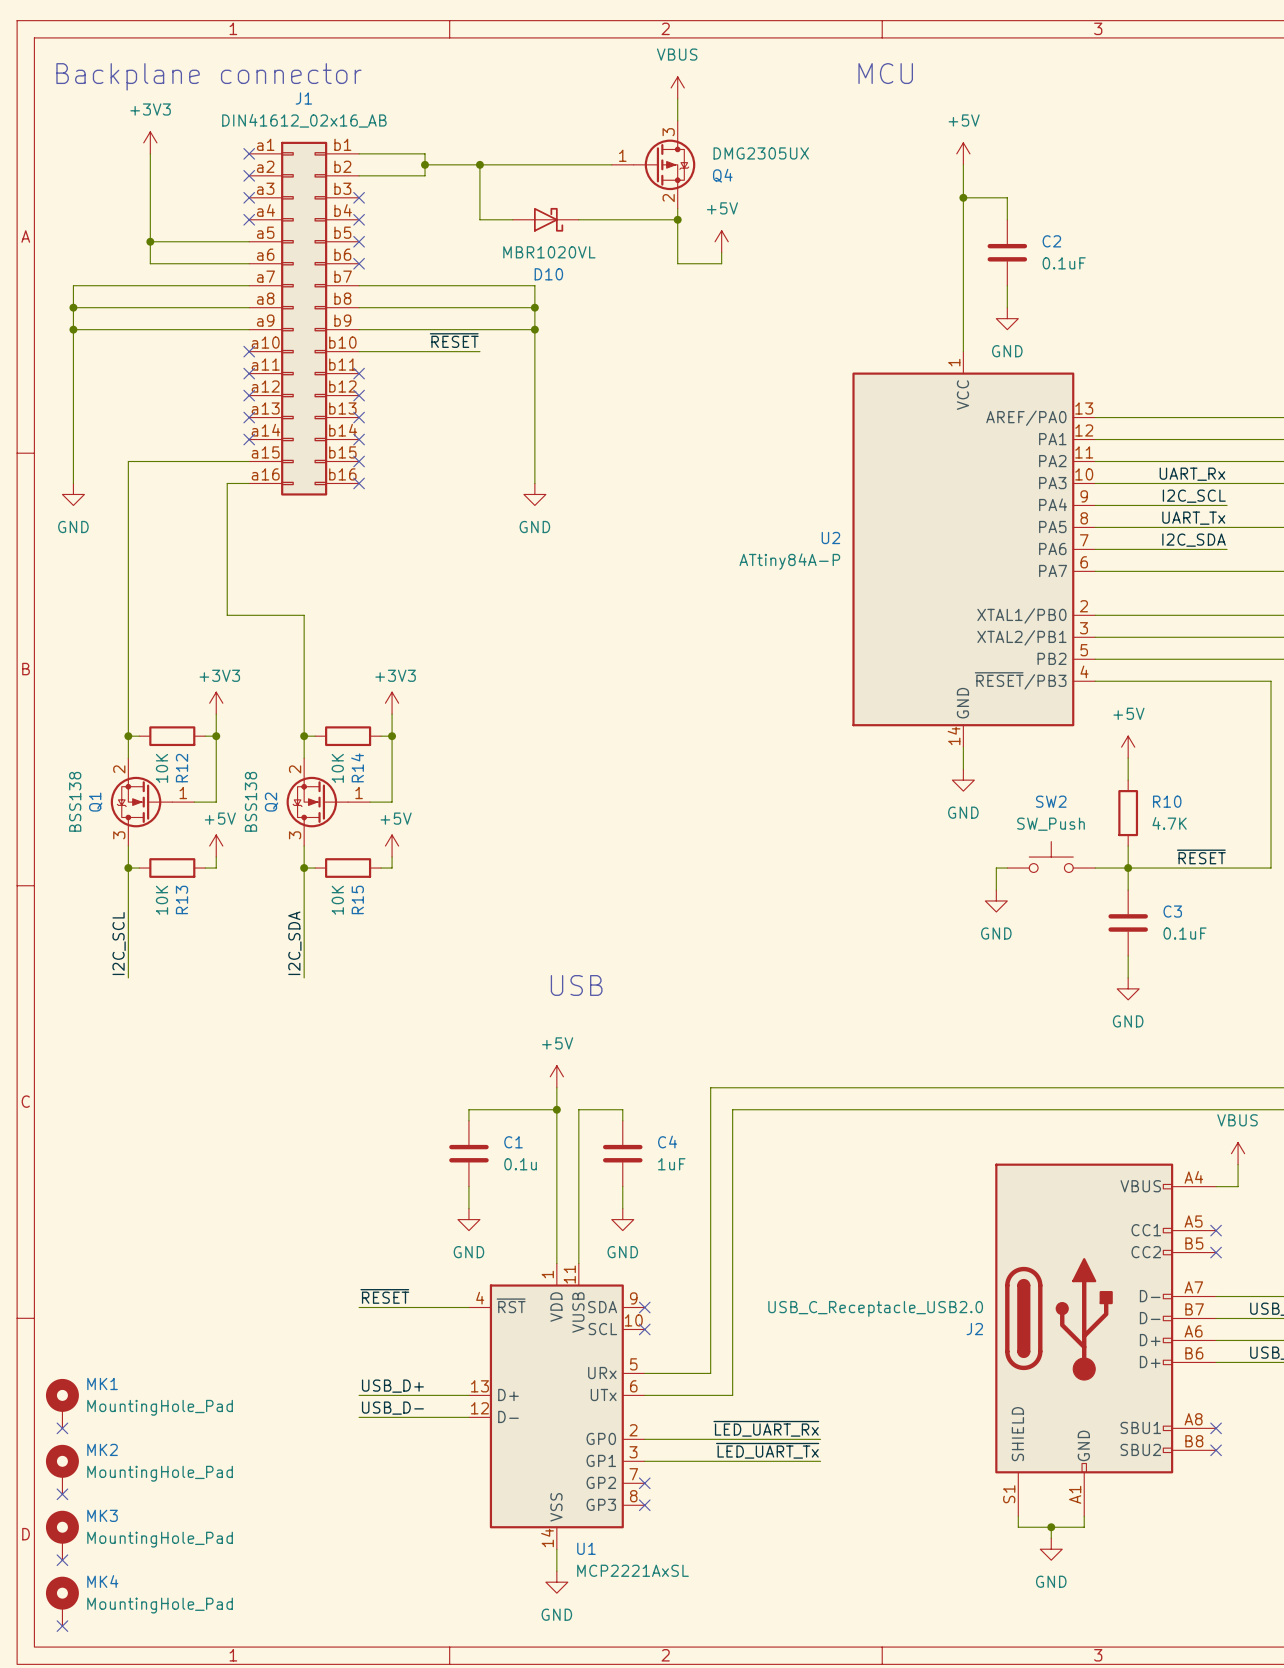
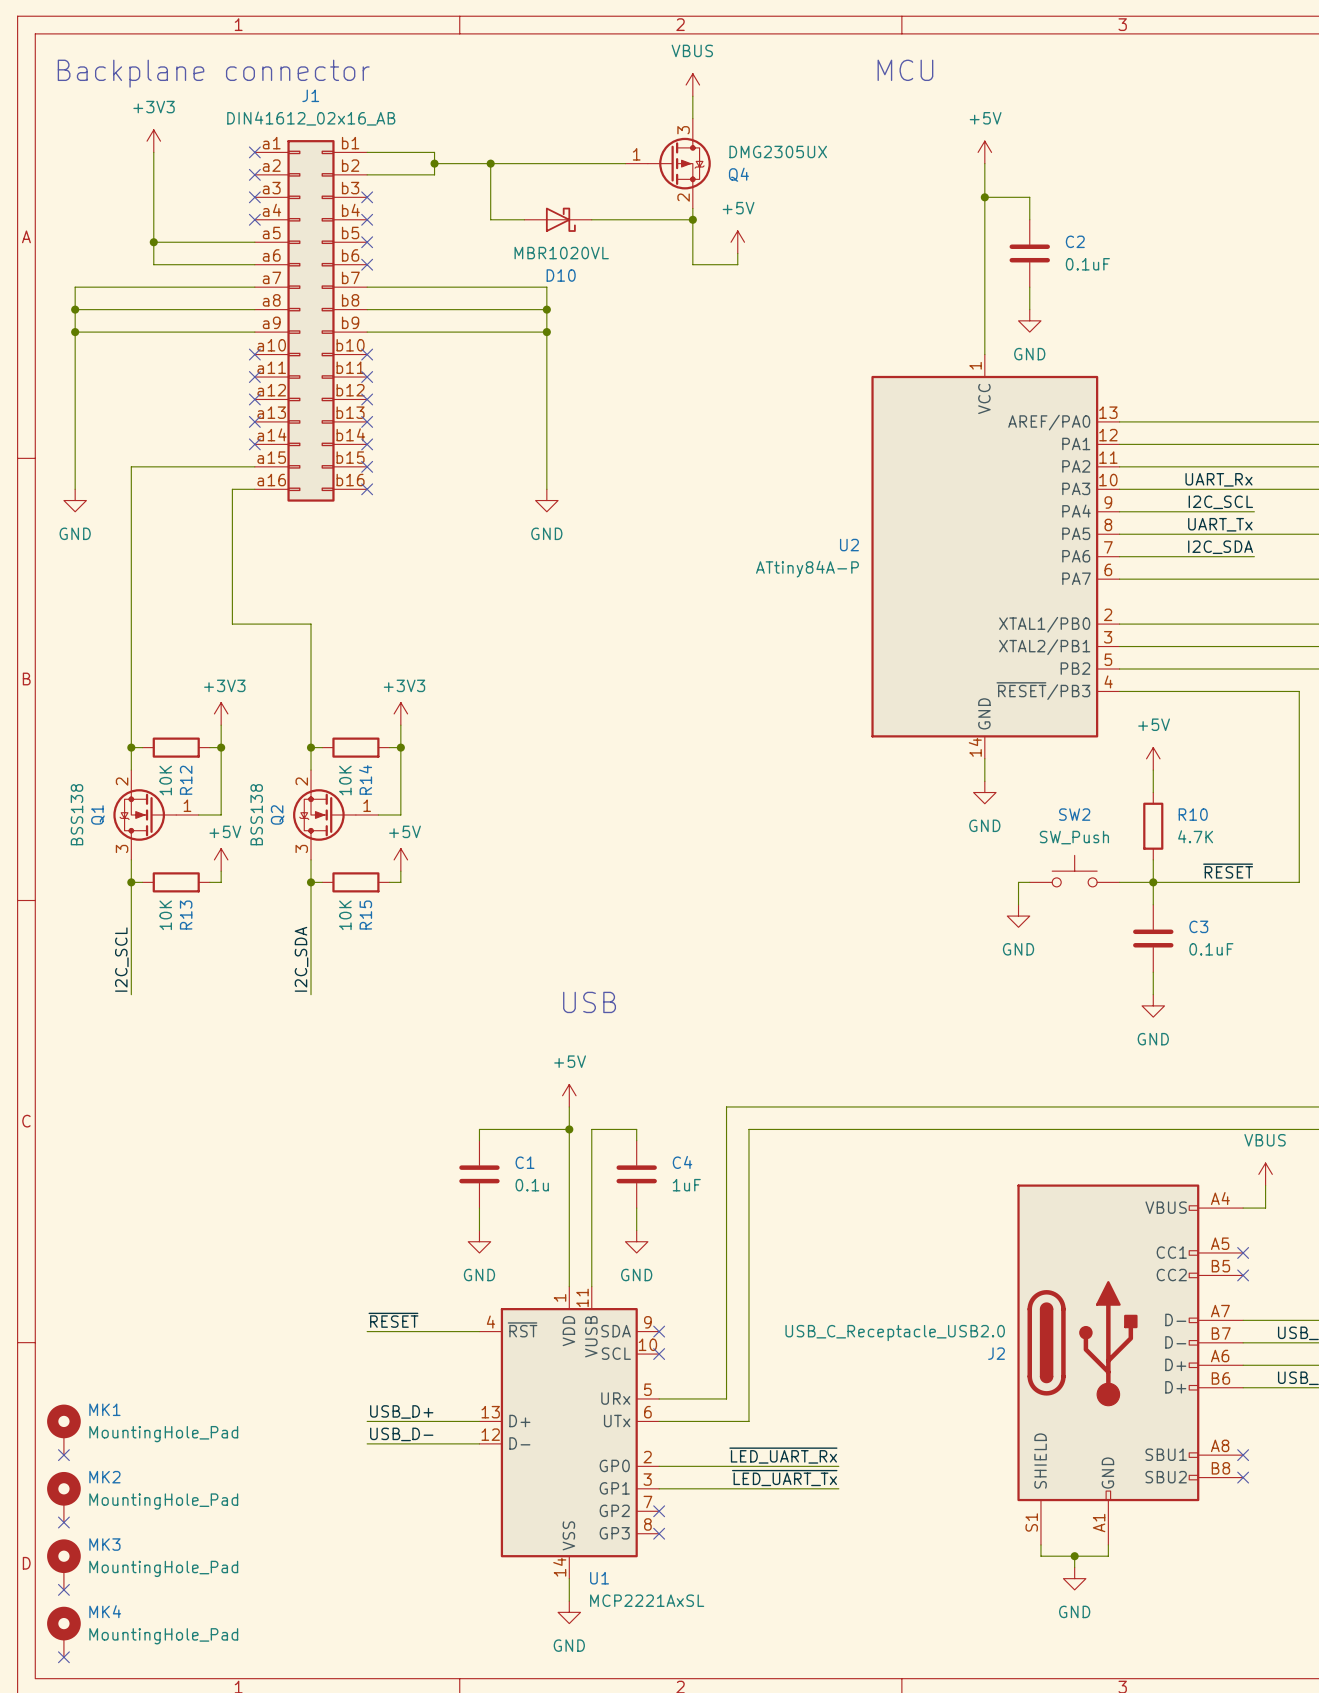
label: ~{RESET} (454, 340) -> none
wire: (359, 351) (479, 351) -> none
no-connect mark: none -> (367, 354)

